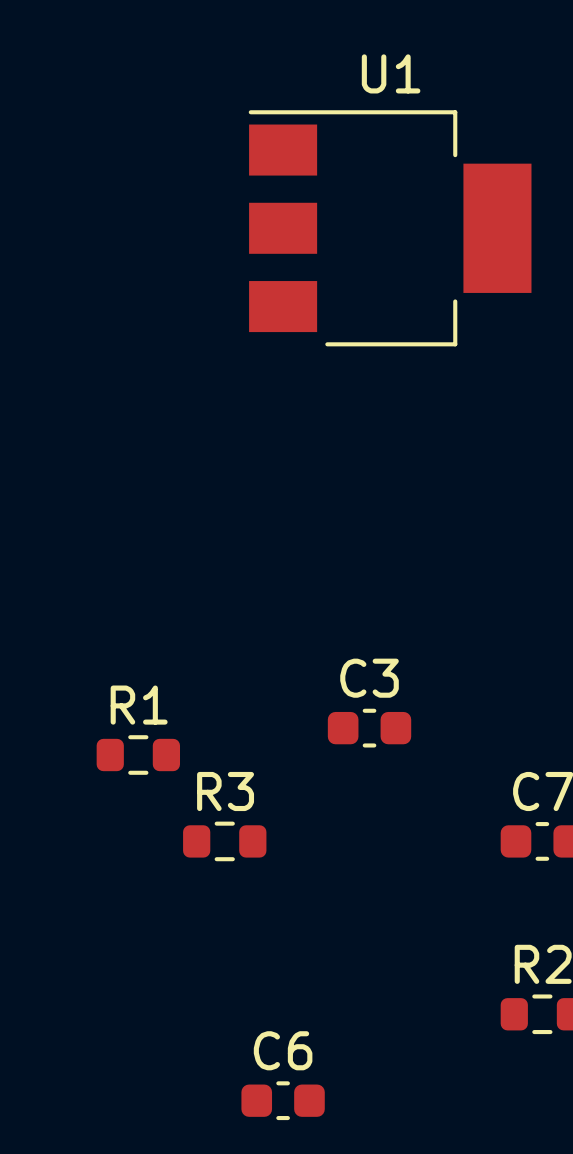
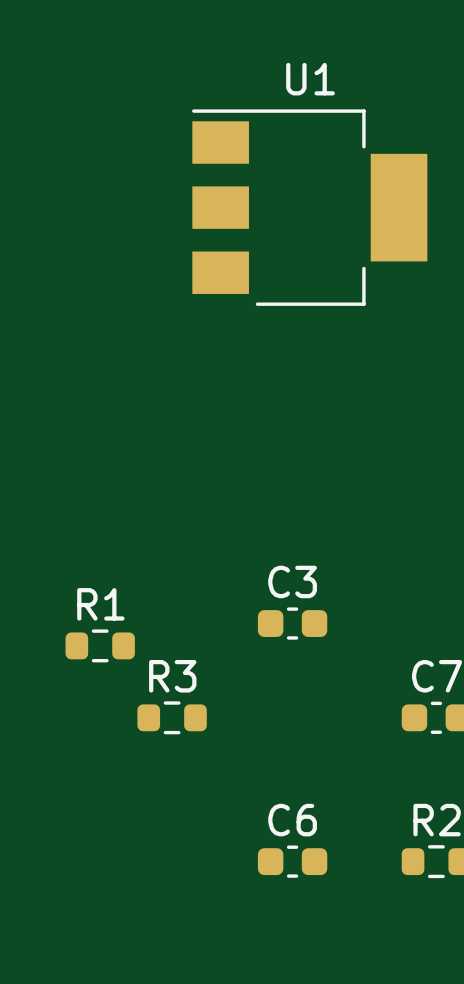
C6 position: (283, 1100) -> (292, 861)

